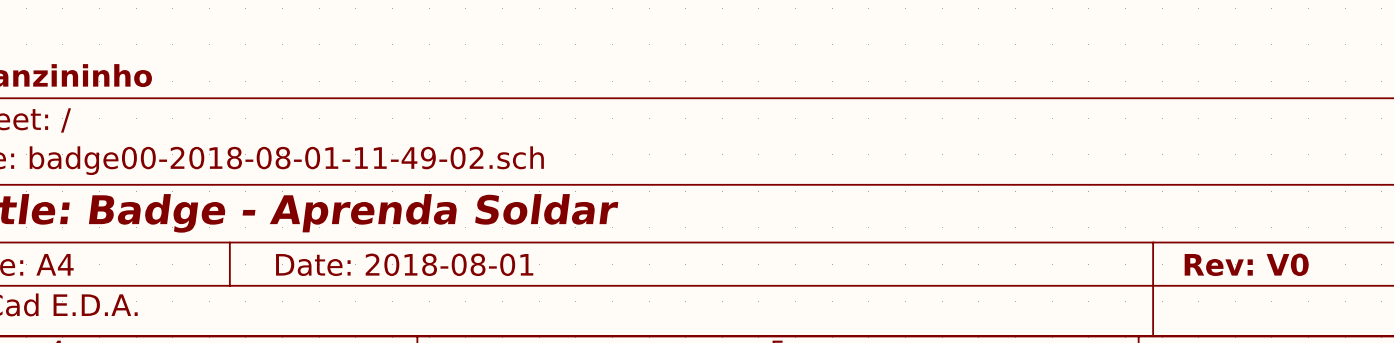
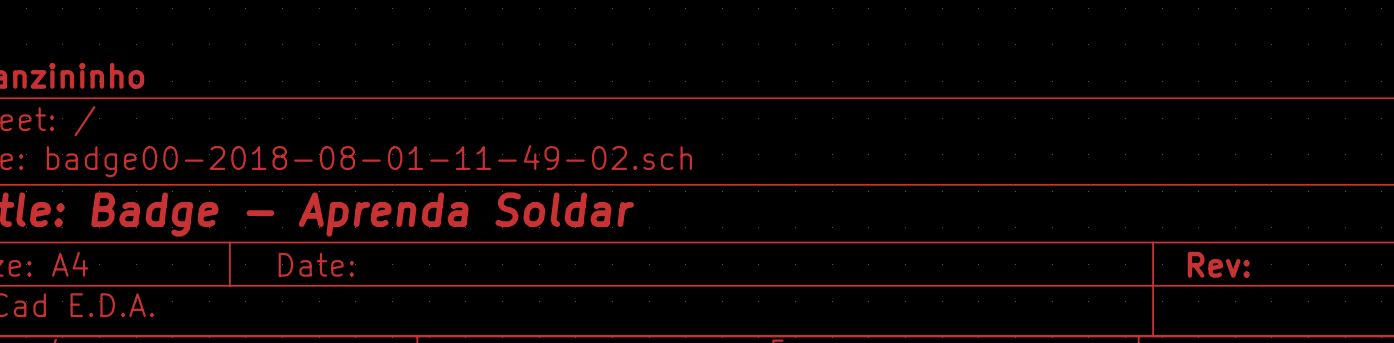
title block: Date: 2018-08-01 (404, 264) -> Date: (316, 264)
title block: Rev: V0 (1246, 264) -> Rev: (1218, 264)

